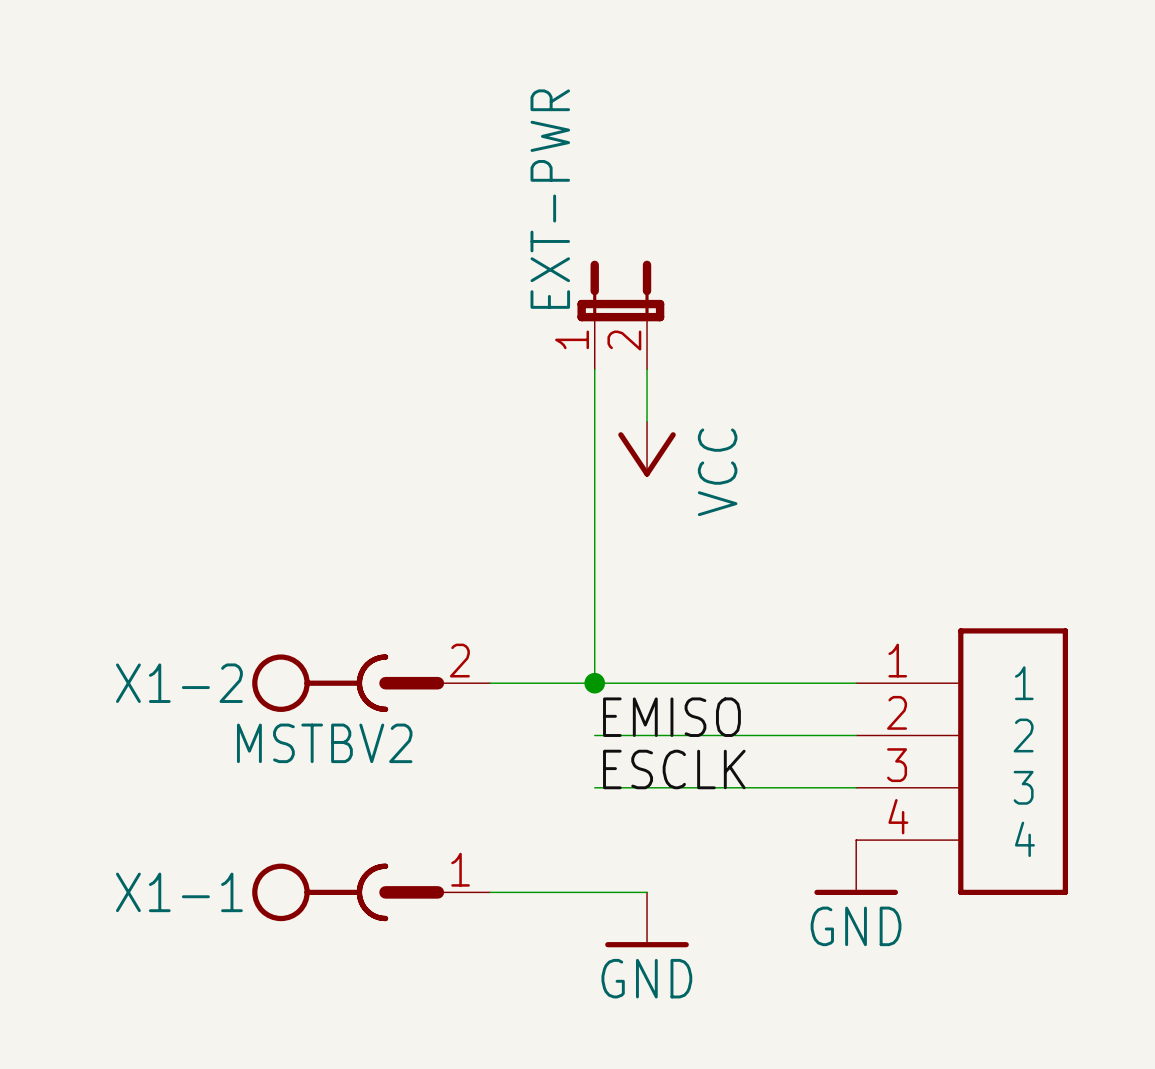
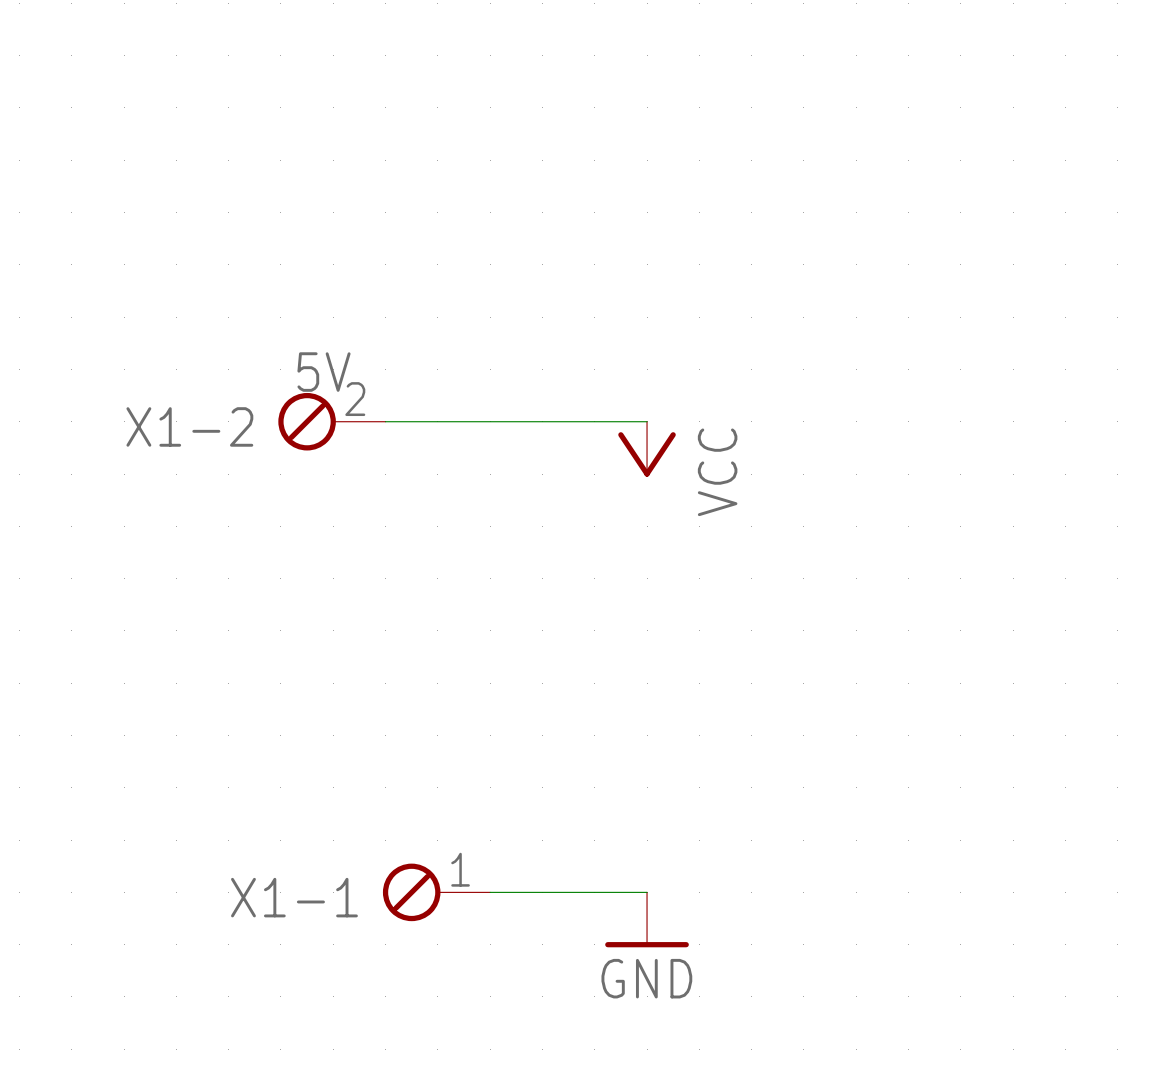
EXT-PWR: (620, 315) -> none
wire: (594, 369) (594, 683) -> none
wire: (647, 369) (647, 421) -> (385, 421) (647, 421)
X1-2 symbol: [252, 654, 491, 712] -> [278, 392, 386, 451]
X1-2 name position: X1-2 (179, 683) -> X1-2 (189, 426)
wire: (490, 683) (856, 683) -> none
junction: (594, 683) -> none
label: EMISO (671, 717) -> none
wire: (594, 735) (856, 735) -> none
X1-2 value: MSTBV2 (324, 743) -> 5V (324, 372)
part: (962, 761) -> none
label: ESCLK (674, 769) -> none
wire: (594, 787) (856, 787) -> none
X1-1 symbol: [252, 863, 491, 922] -> [382, 863, 491, 922]
power symbol: GND (856, 867) -> none
X1-1 name position: X1-1 (179, 892) -> X1-1 (294, 897)

